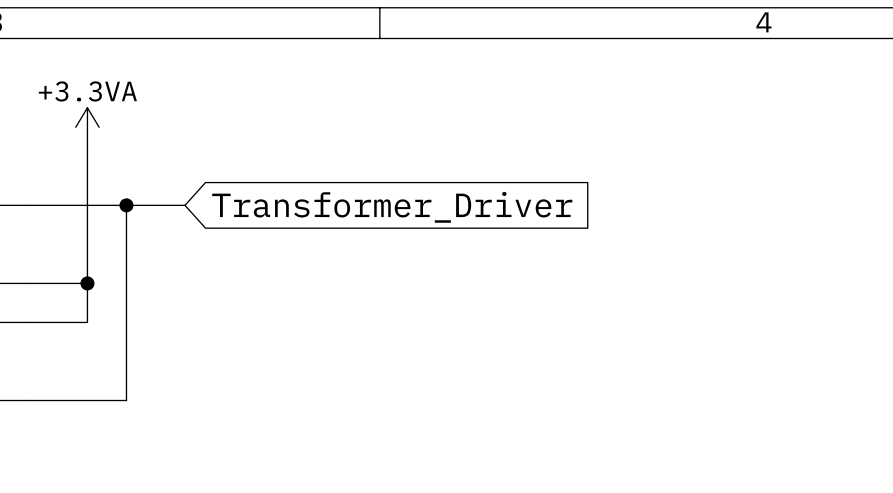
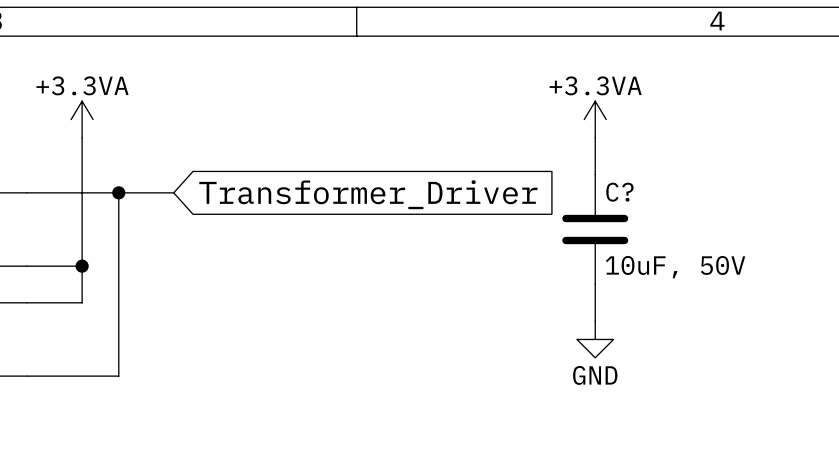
power symbol: none -> +3.3VA (595, 119)
wire: none -> (595, 137) (595, 174)
C?: none -> 10uF, 50V (595, 229)
wire: none -> (595, 284) (595, 321)
power symbol: none -> GND (595, 339)

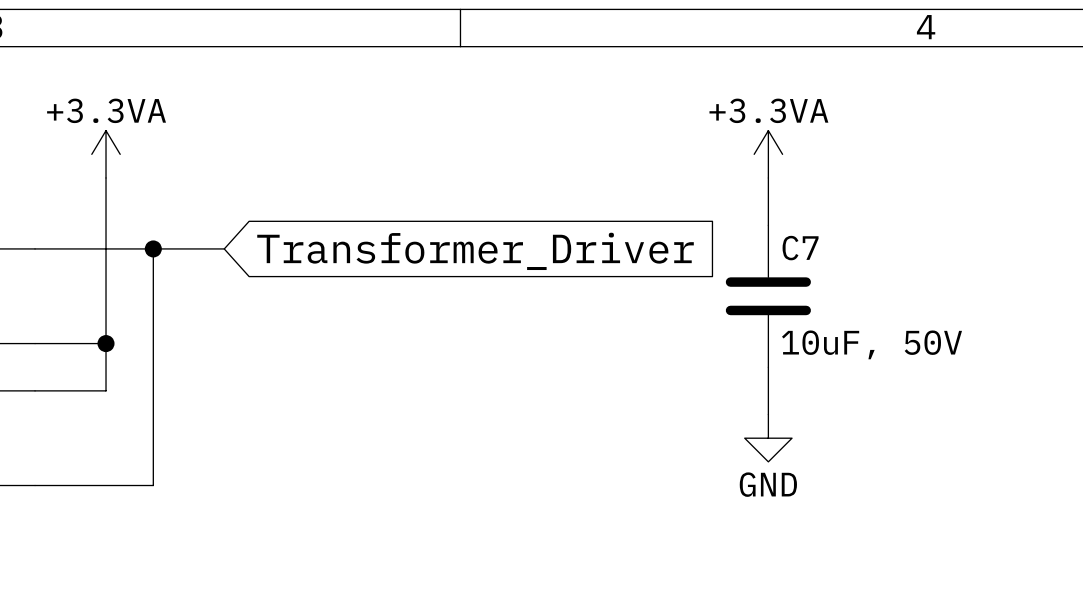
C? name: C? (619, 192) -> C7 (800, 248)

